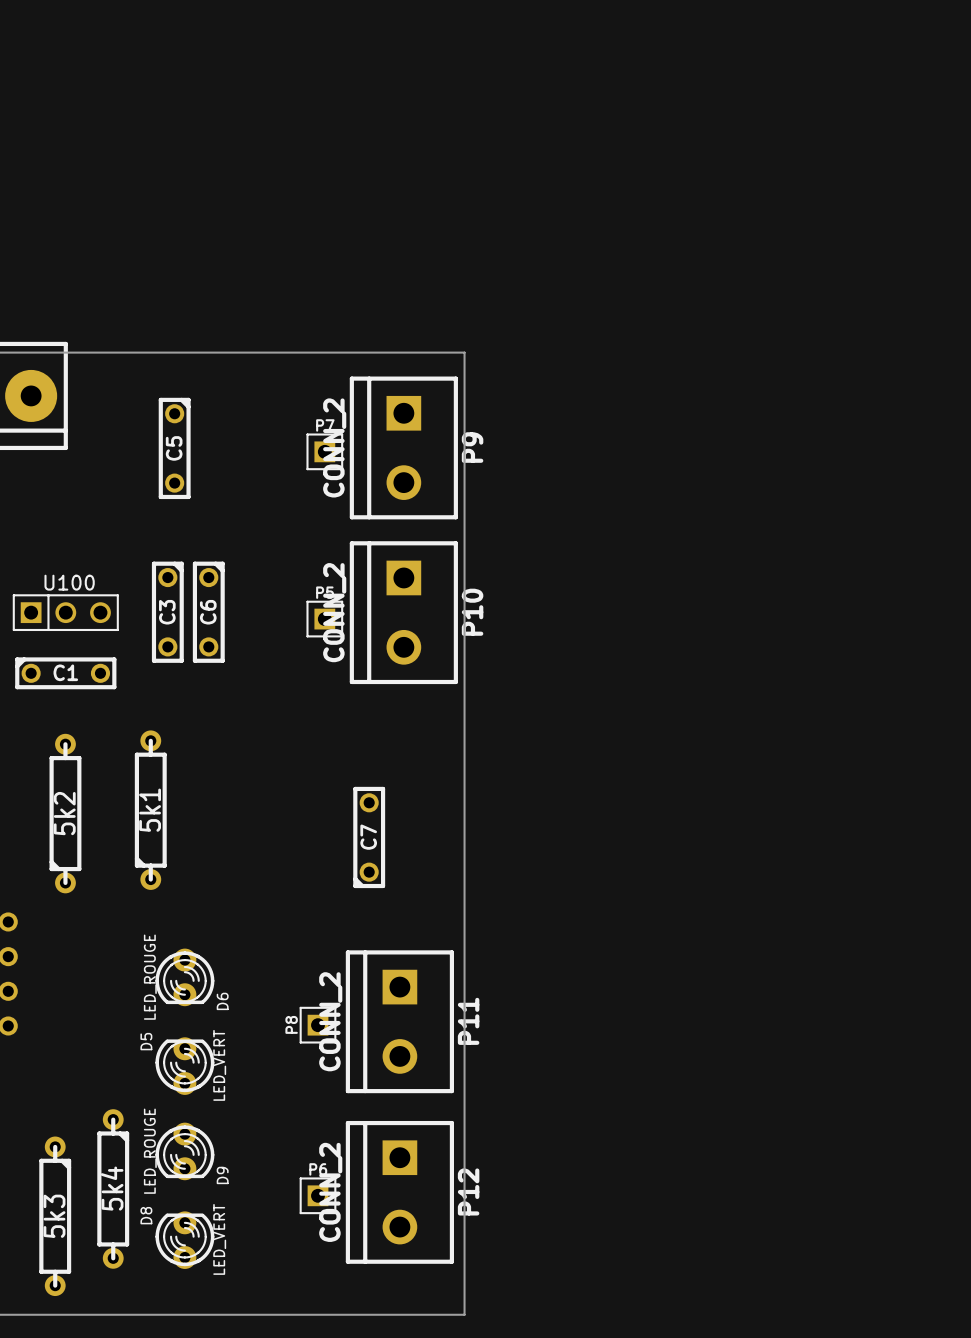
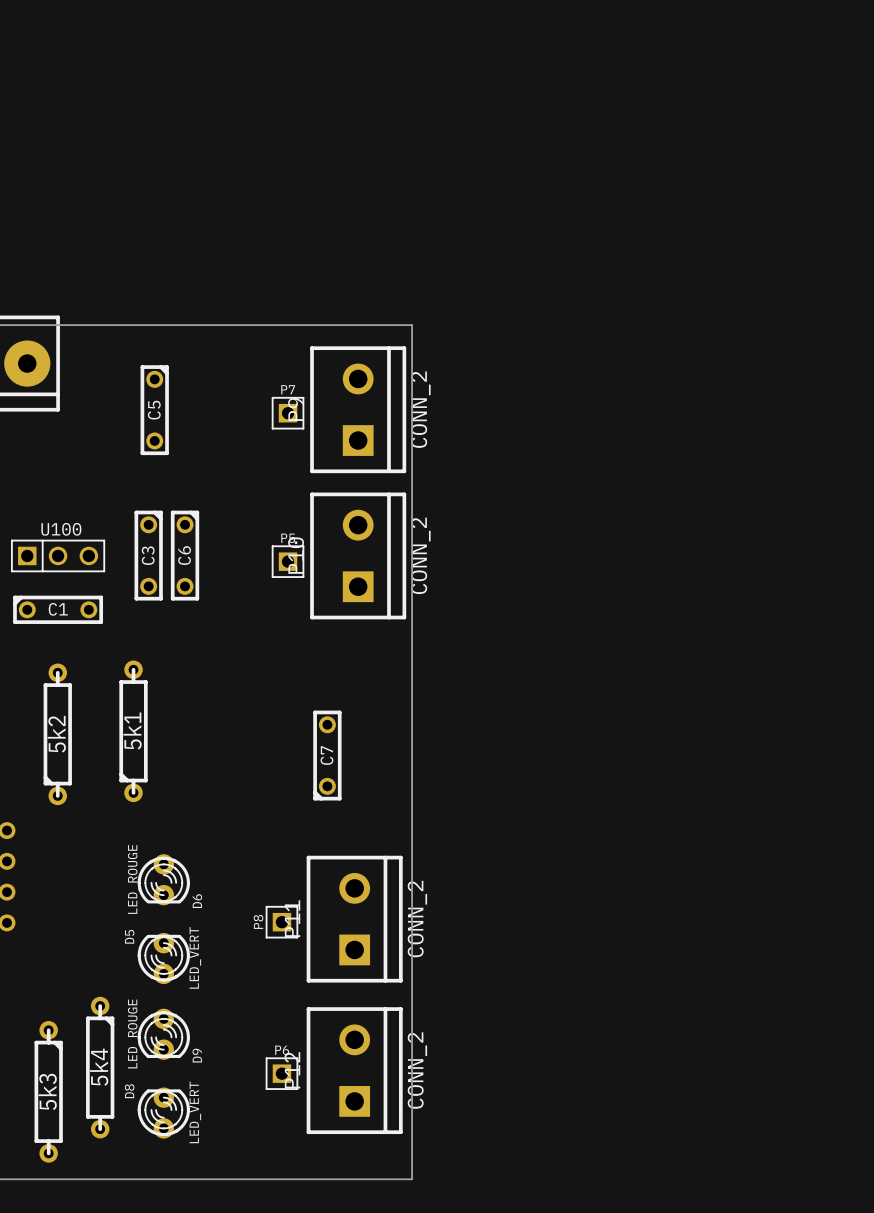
P9 rotation: 0° (403, 447) -> 180° (358, 409)
P10 rotation: 0° (403, 612) -> 180° (358, 555)
P11 rotation: 0° (399, 1021) -> 180° (354, 919)
P12 rotation: 0° (399, 1192) -> 180° (354, 1070)

